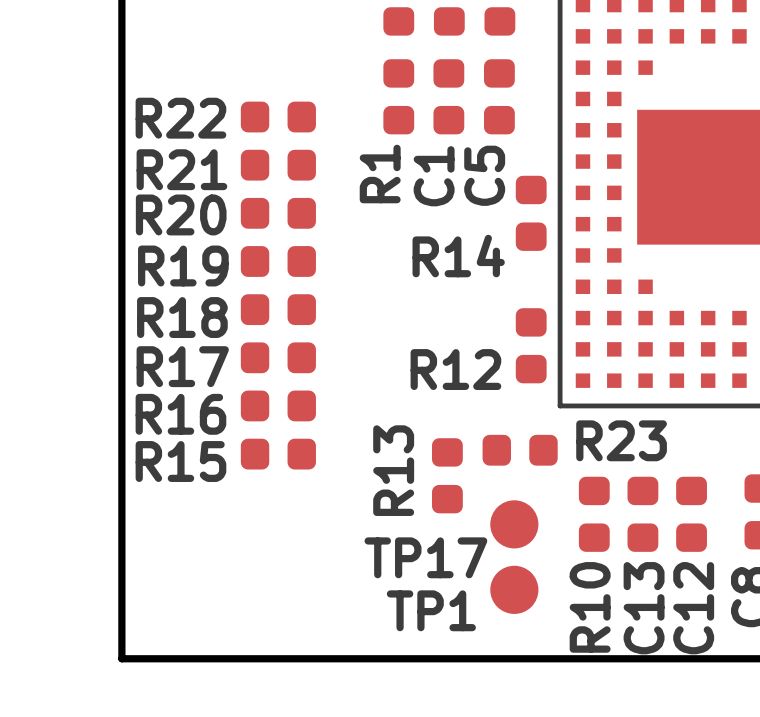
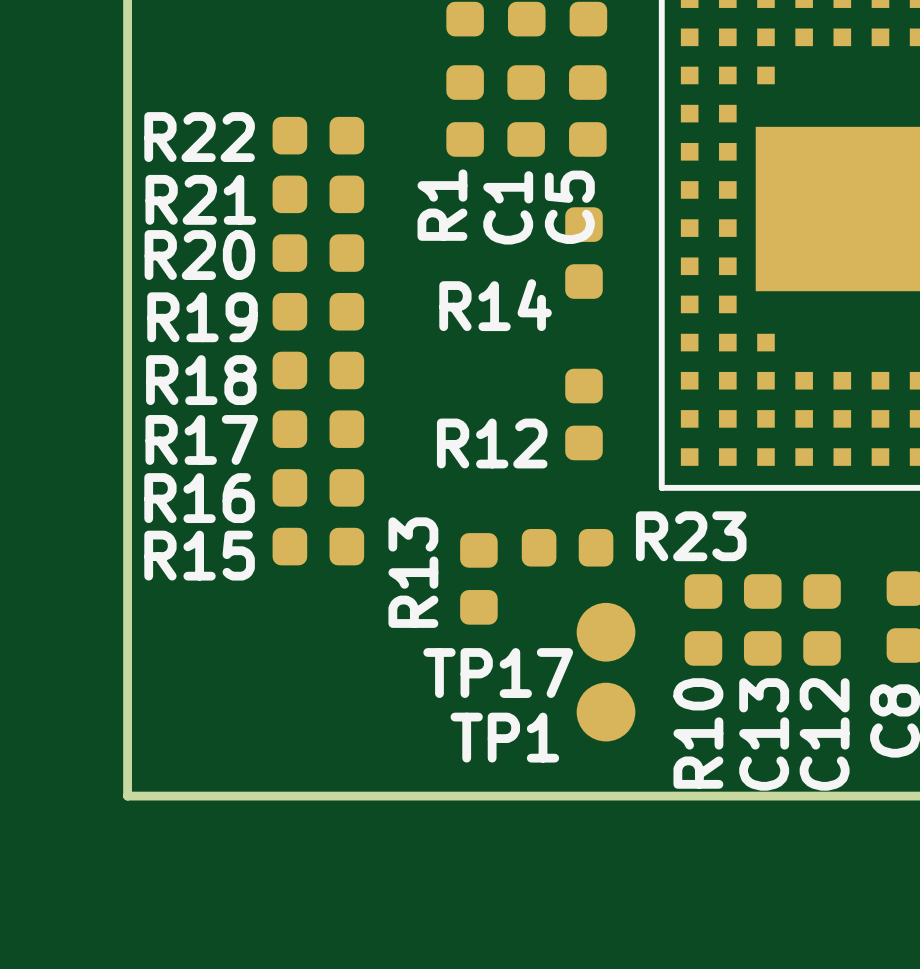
R14 position: (531, 213) -> (584, 253)
R12 position: (531, 345) -> (584, 414)
R23 position: (520, 450) -> (567, 547)
R13 position: (447, 475) -> (478, 578)

